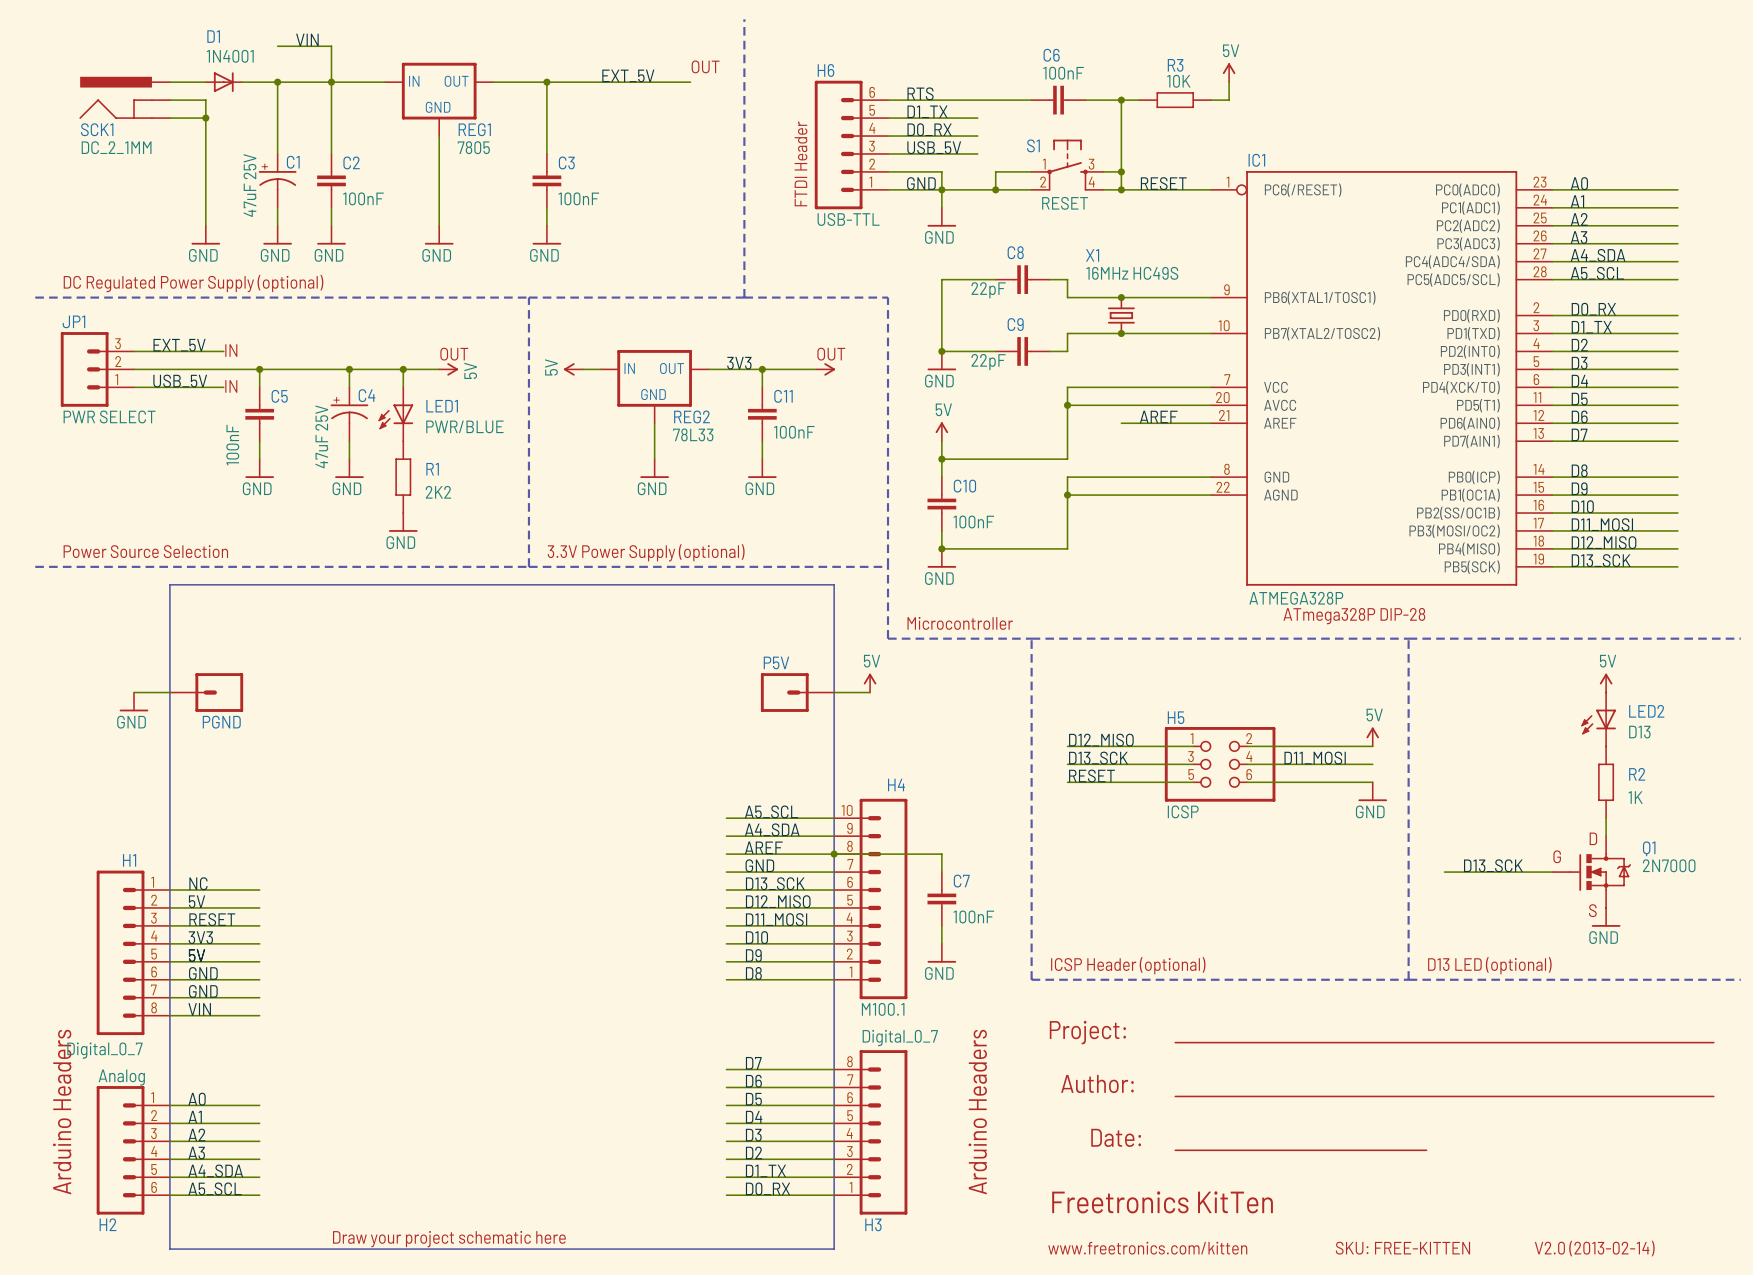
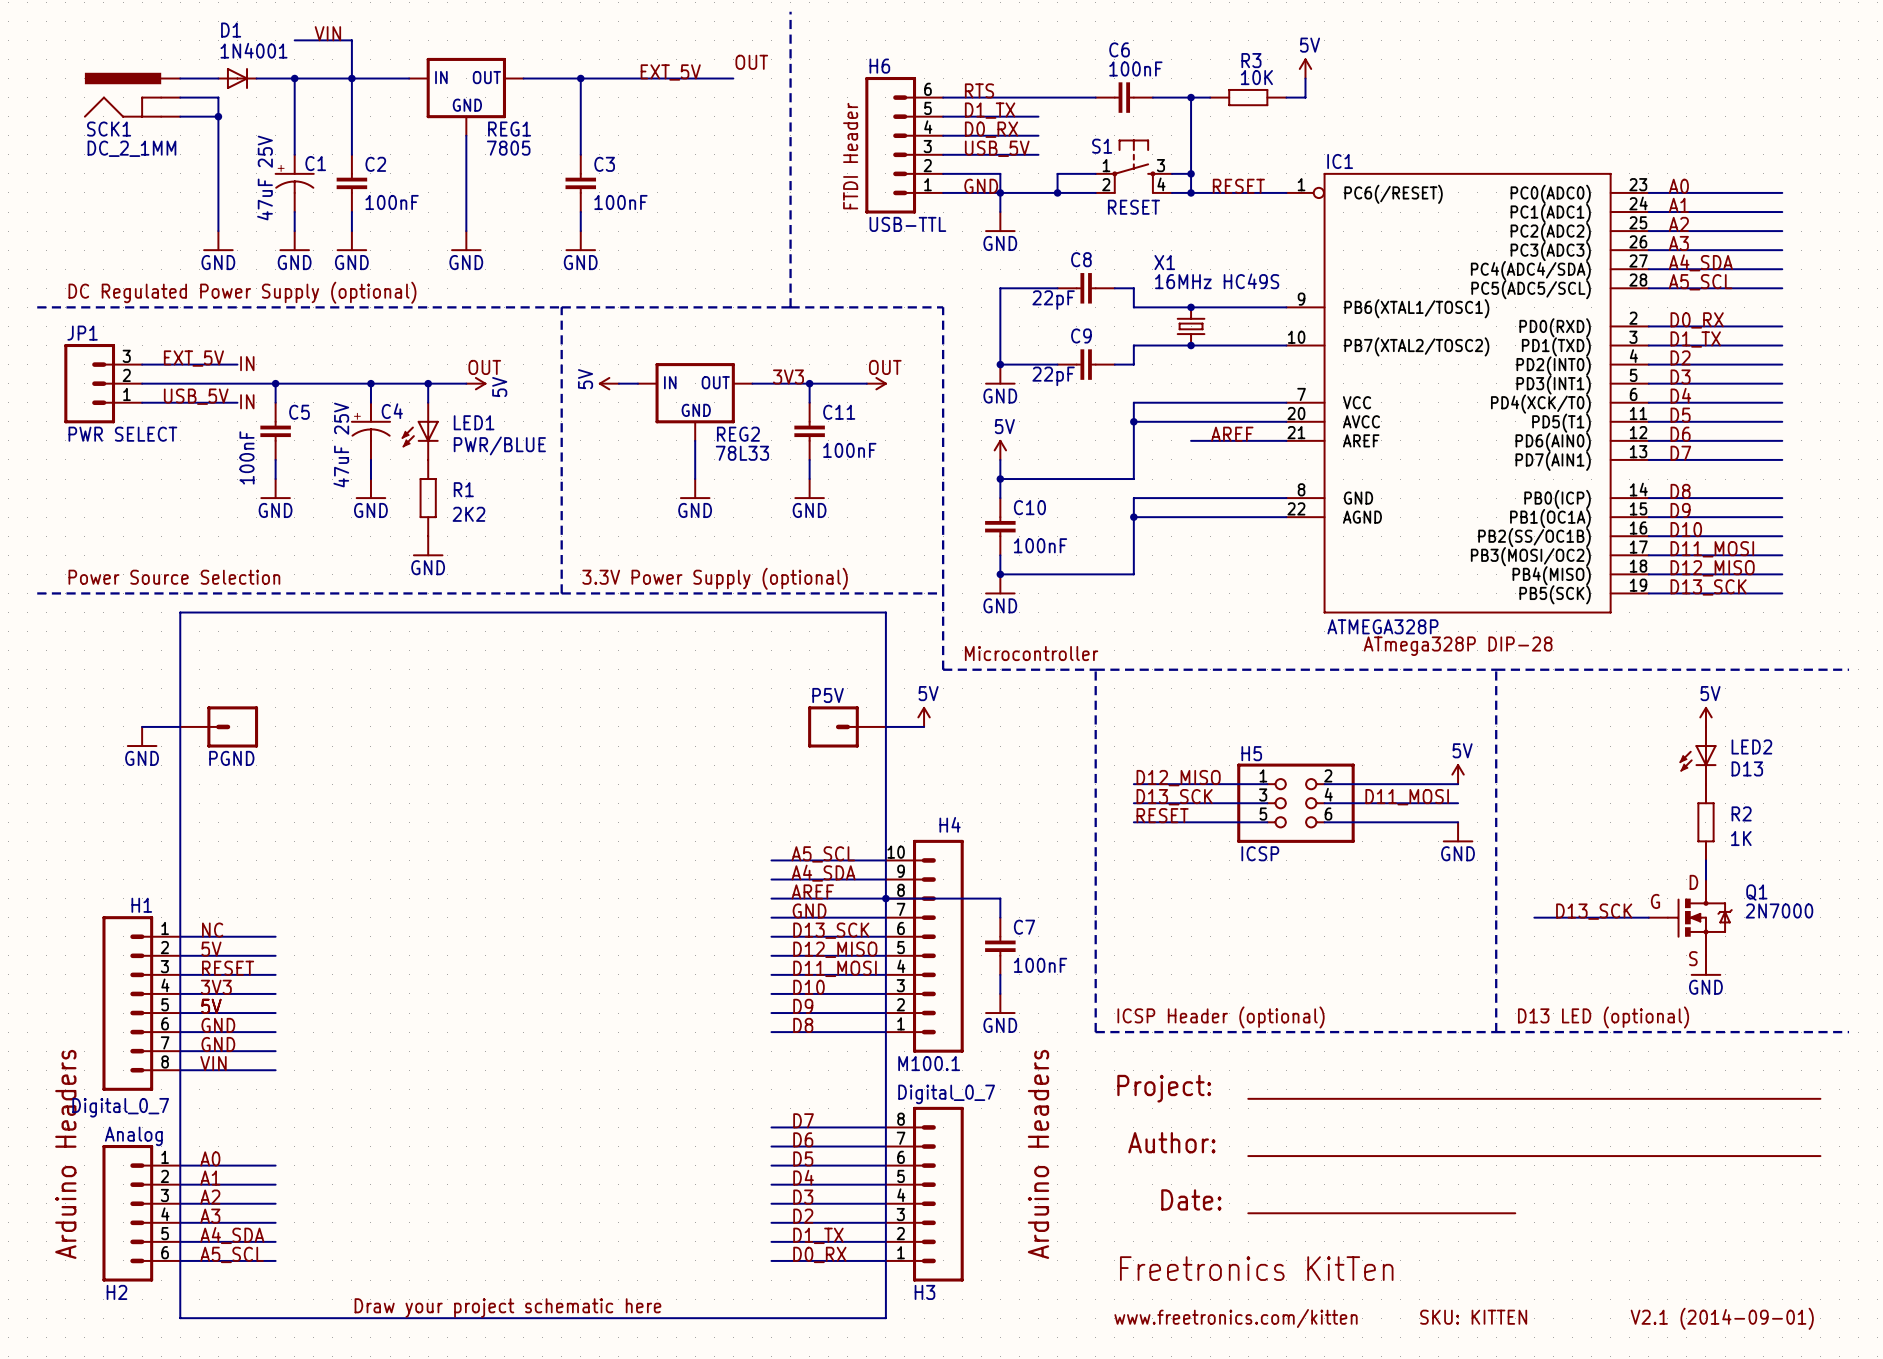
text: SKU: FREE-KITTEN (1402, 1248) -> SKU: KITTEN (1473, 1317)
text: V2.0 (2013-02-14) (1594, 1248) -> V2.1 (2014-09-01) (1722, 1318)

